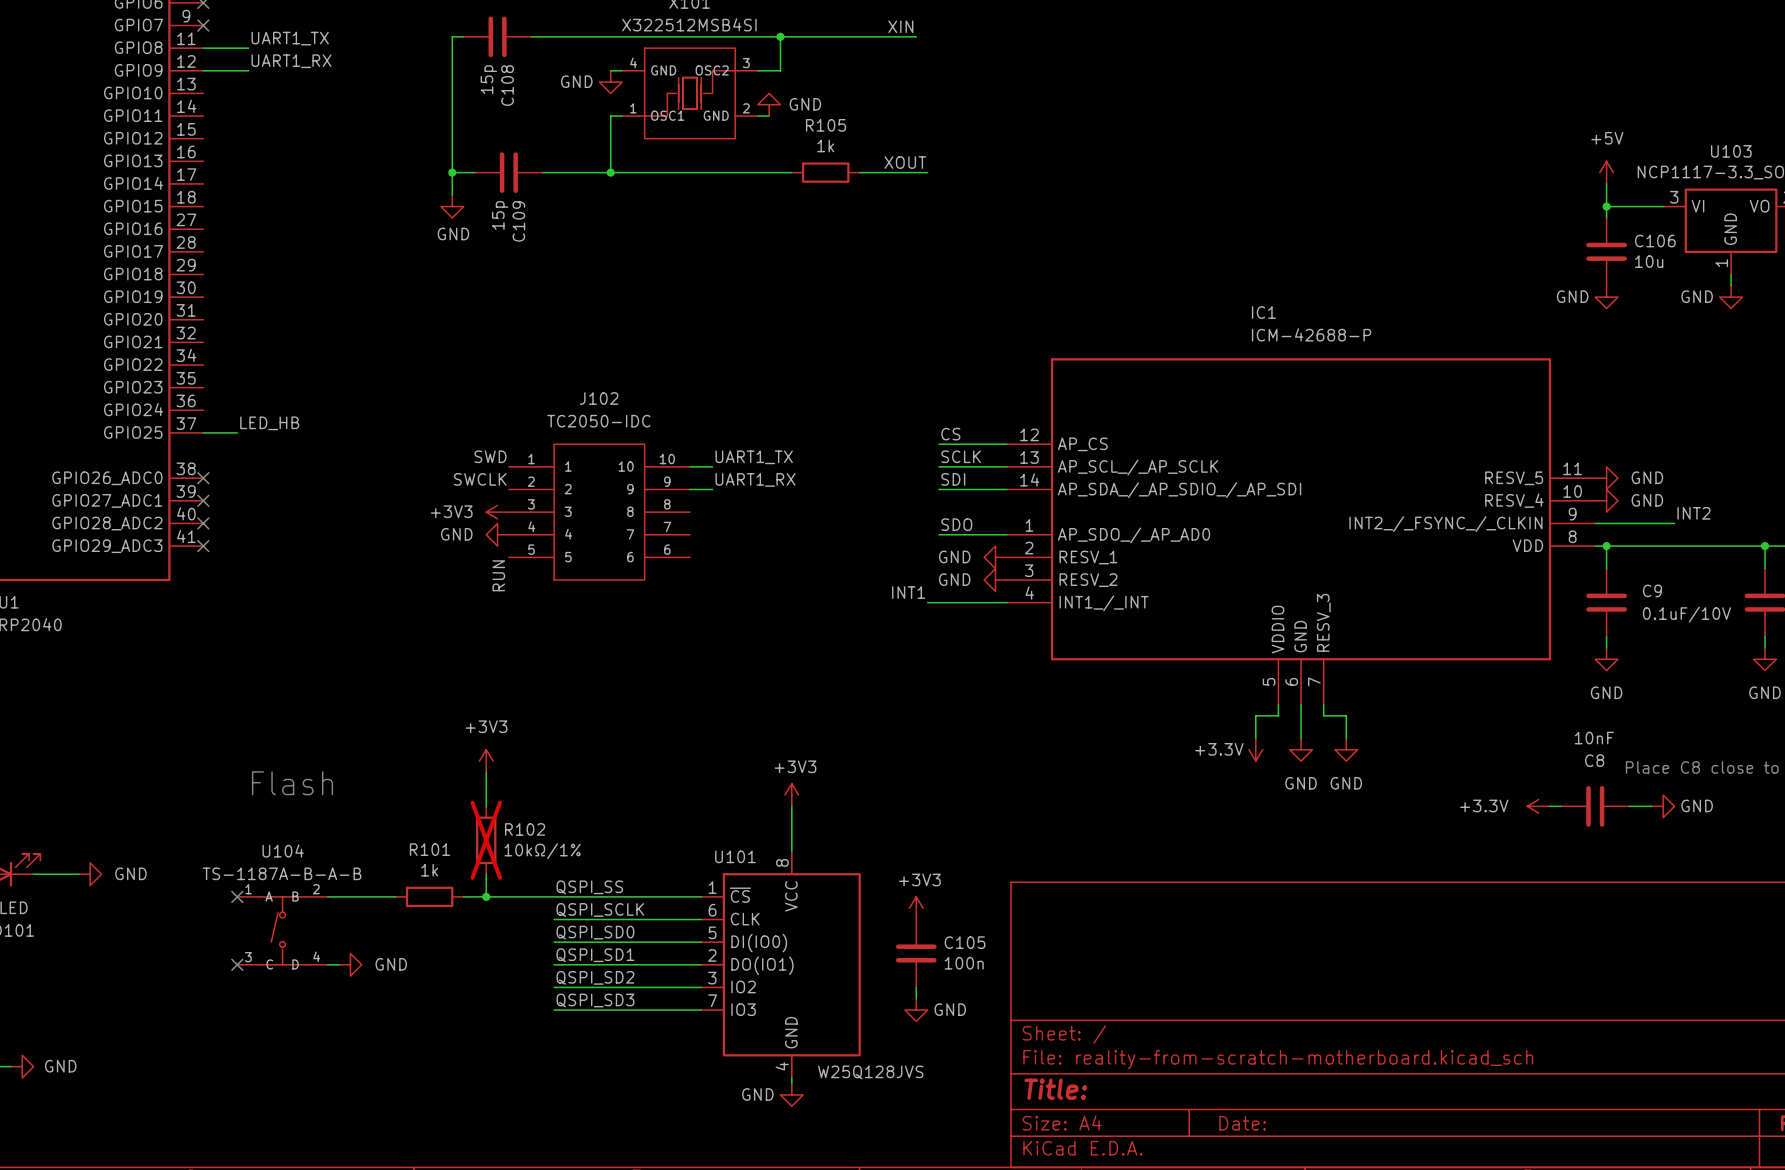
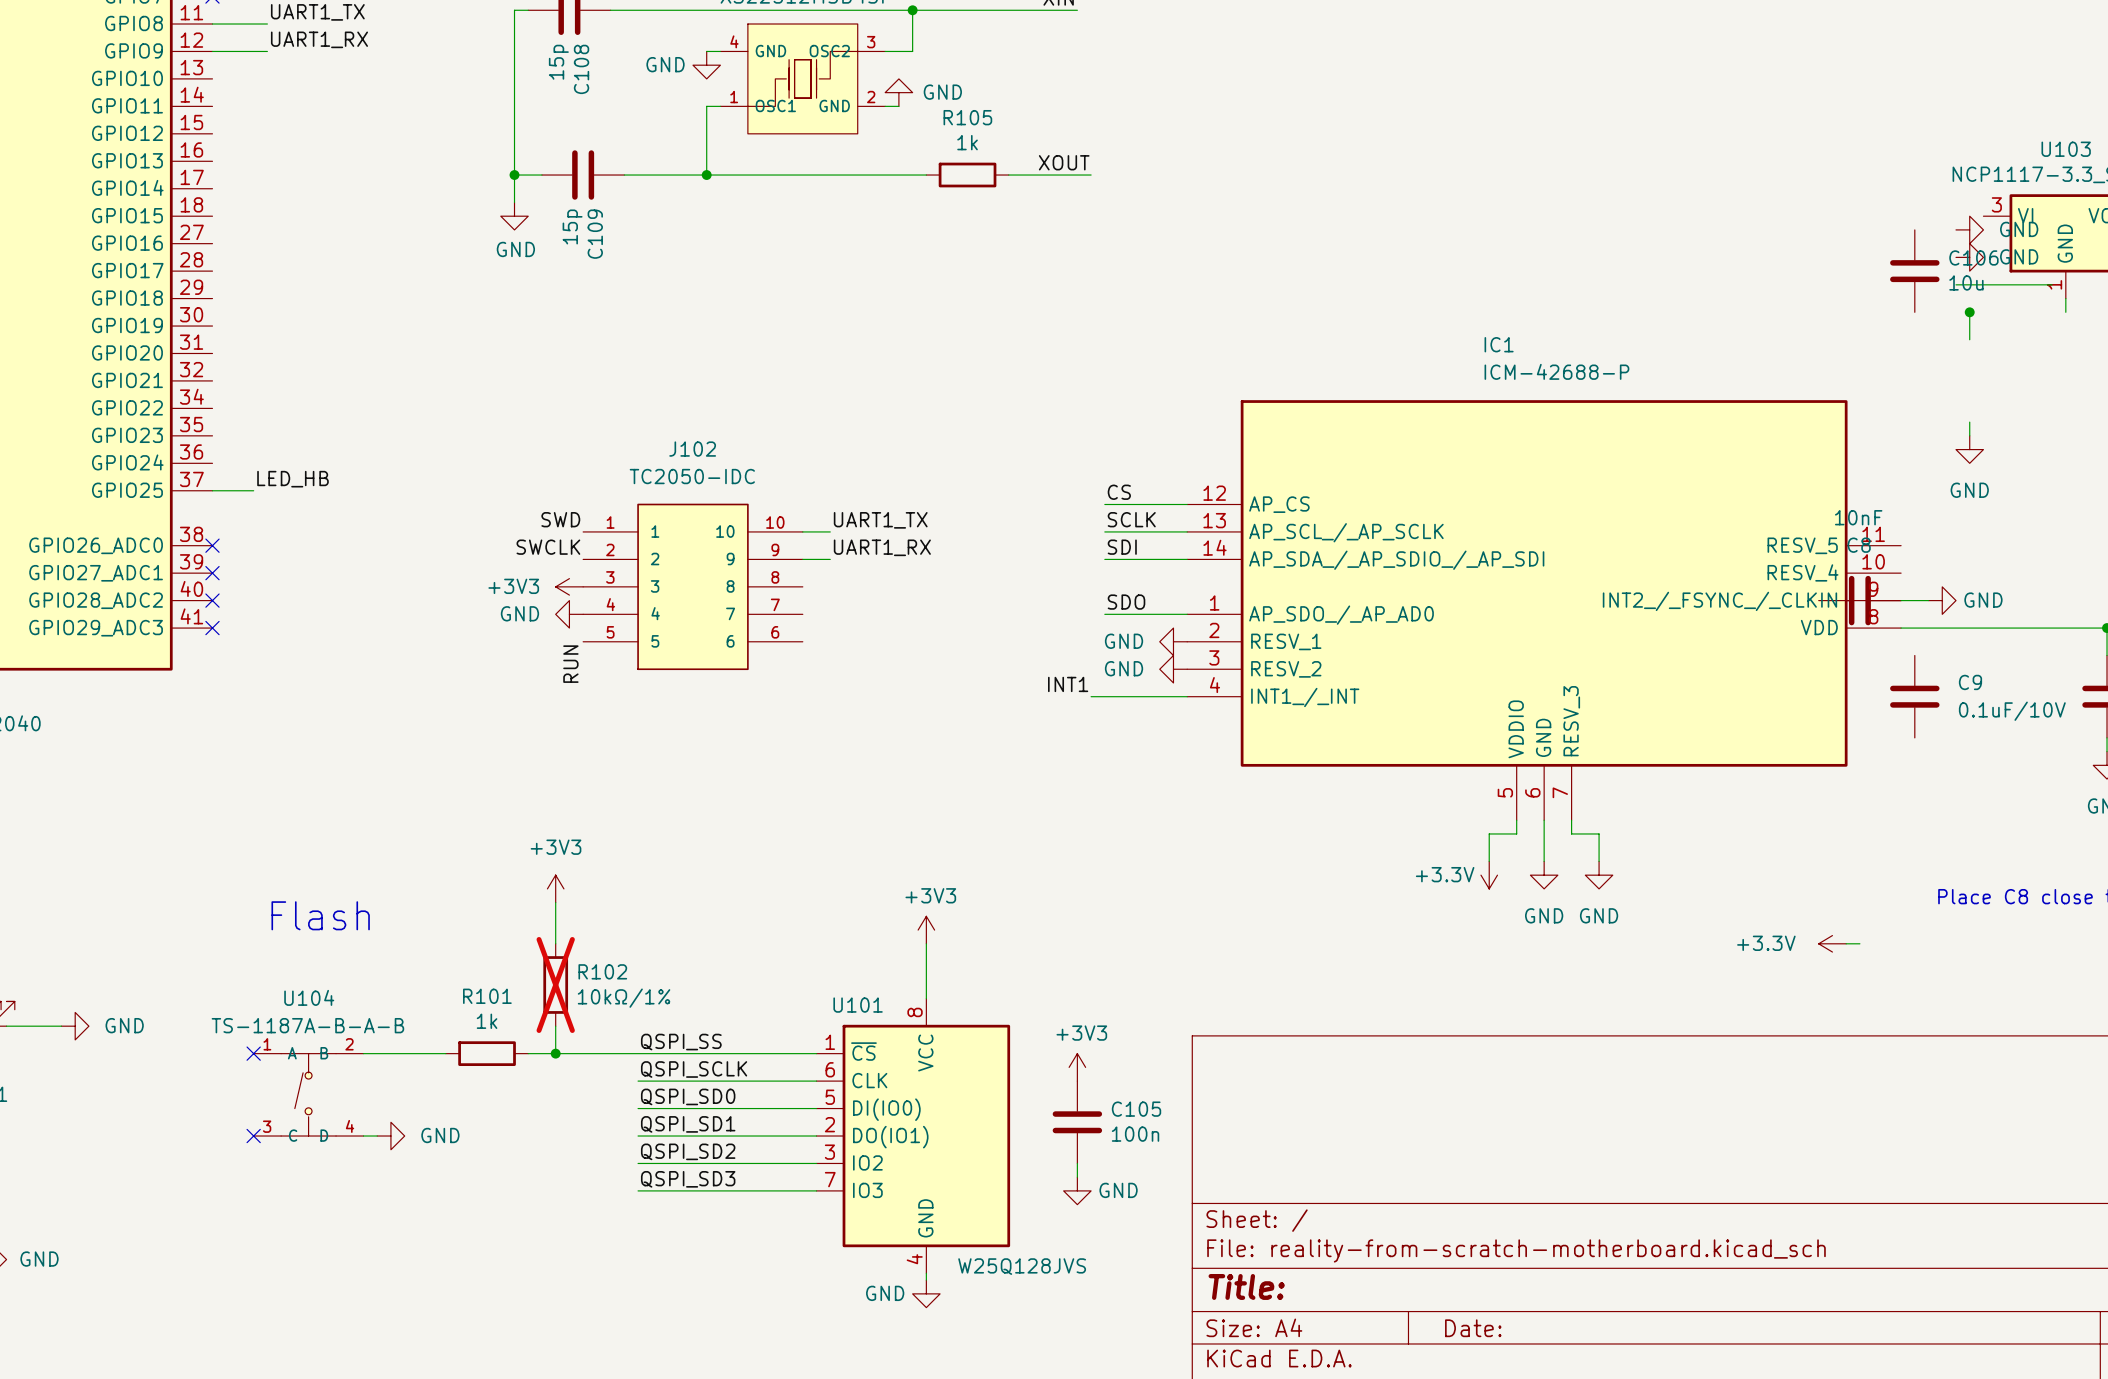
power symbol: +5V (1606, 172) -> none
wire: (1606, 183) (1606, 217) -> none
wire: (1606, 206) (1663, 206) -> none
junction: (1606, 206) -> none
power symbol: none -> GND (1969, 229)
power symbol: none -> GND (1969, 257)
wire: none -> (1956, 284) (2052, 284)
wire: none -> (1969, 312) (1969, 339)
junction: none -> (1969, 312)
power symbol: GND (1606, 297) -> none
power symbol: GND (1731, 297) -> none
wire: none -> (1969, 422) (1969, 435)
power symbol: none -> GND (1969, 449)
power symbol: GND (1606, 478) -> none
power symbol: GND (1606, 500) -> none
label: INT2 (1693, 513) -> none
wire: (1617, 523) (1674, 523) -> none
power symbol: none -> GND (1942, 600)
wire: (1606, 546) (1606, 568) -> none
junction: (1606, 546) -> none
wire: (1606, 636) (1606, 647) -> none
power symbol: GND (1606, 659) -> none
C8 position: (1595, 806) -> (1859, 600)
wire: (1629, 806) (1651, 806) -> none
power symbol: GND (1663, 806) -> none

